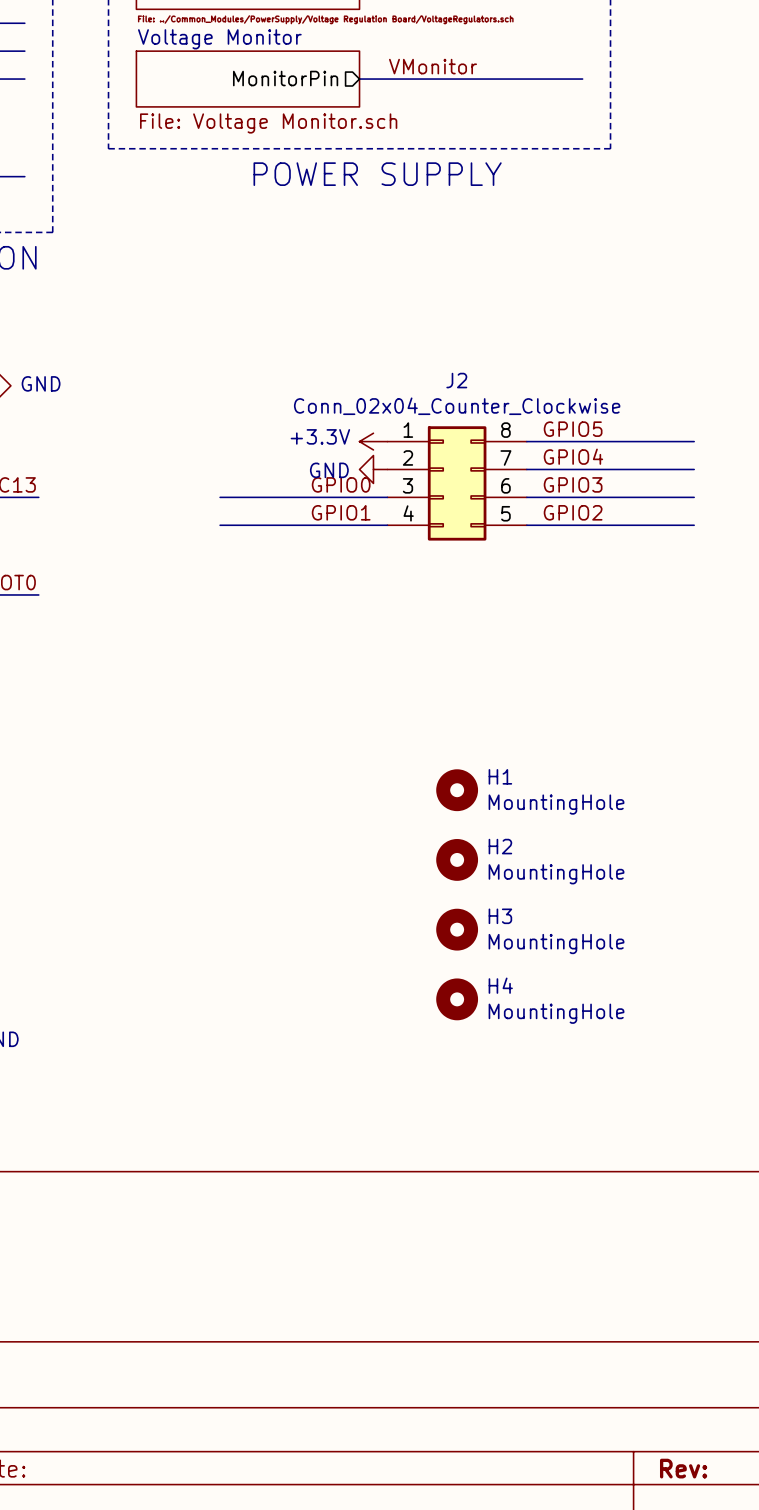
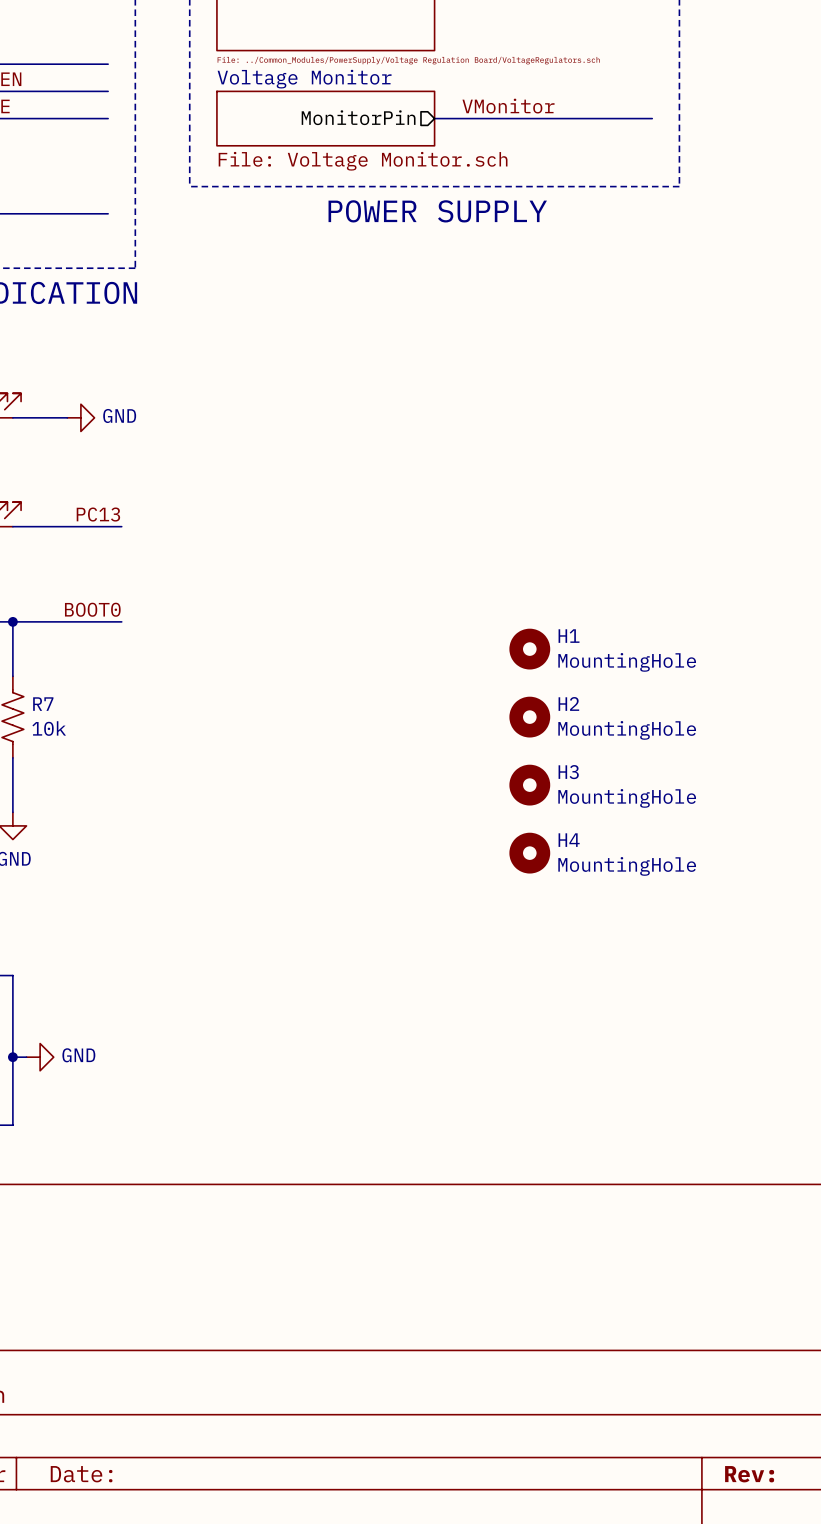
label: GPIO5 (573, 429) -> none
power symbol: +3.3V (373, 441) -> none
wire: (526, 441) (694, 441) -> none
label: GPIO4 (573, 456) -> none
power symbol: GND (373, 469) -> none
wire: (526, 469) (694, 469) -> none
J2: Conn_02x04_Counter_Clockwise (457, 483) -> none
label: GPIO0 (341, 484) -> none
label: GPIO3 (573, 484) -> none
wire: (220, 497) (387, 497) -> none
wire: (526, 497) (694, 497) -> none
label: GPIO1 (341, 512) -> none
label: GPIO2 (573, 512) -> none
wire: (220, 525) (387, 525) -> none
wire: (526, 525) (694, 525) -> none
H1 position: (457, 790) -> (529, 649)
H2 position: (457, 859) -> (529, 717)
H3 position: (457, 929) -> (529, 785)
H4 position: (457, 999) -> (529, 853)

